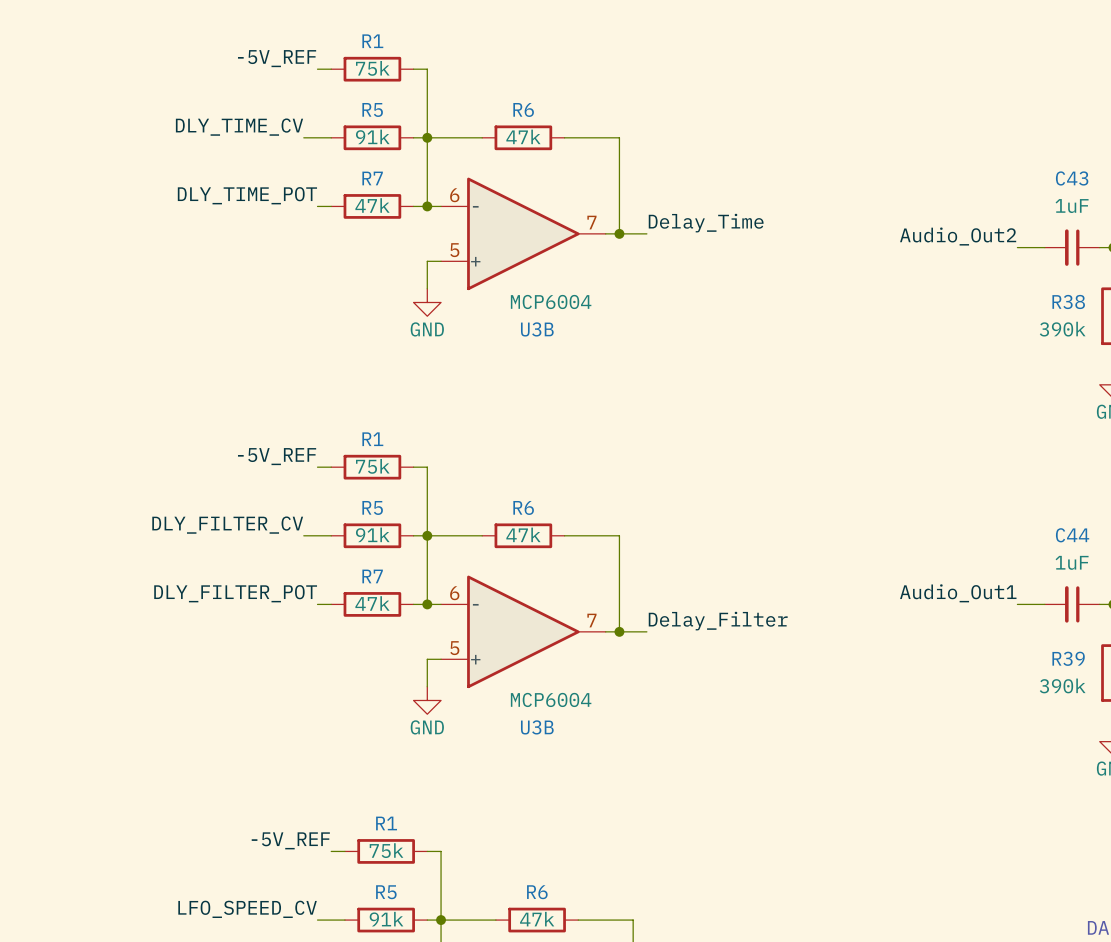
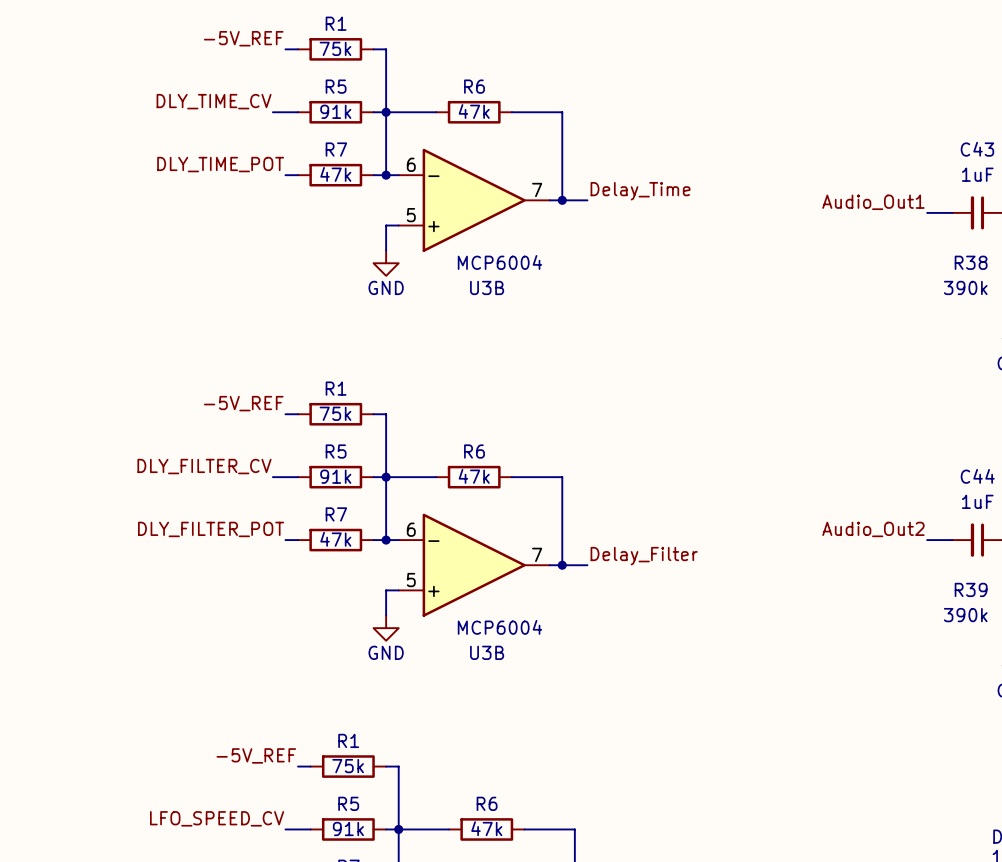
label: Audio_Out2 (958, 236) -> Audio_Out1 (873, 202)
label: Audio_Out1 (958, 593) -> Audio_Out2 (873, 529)

